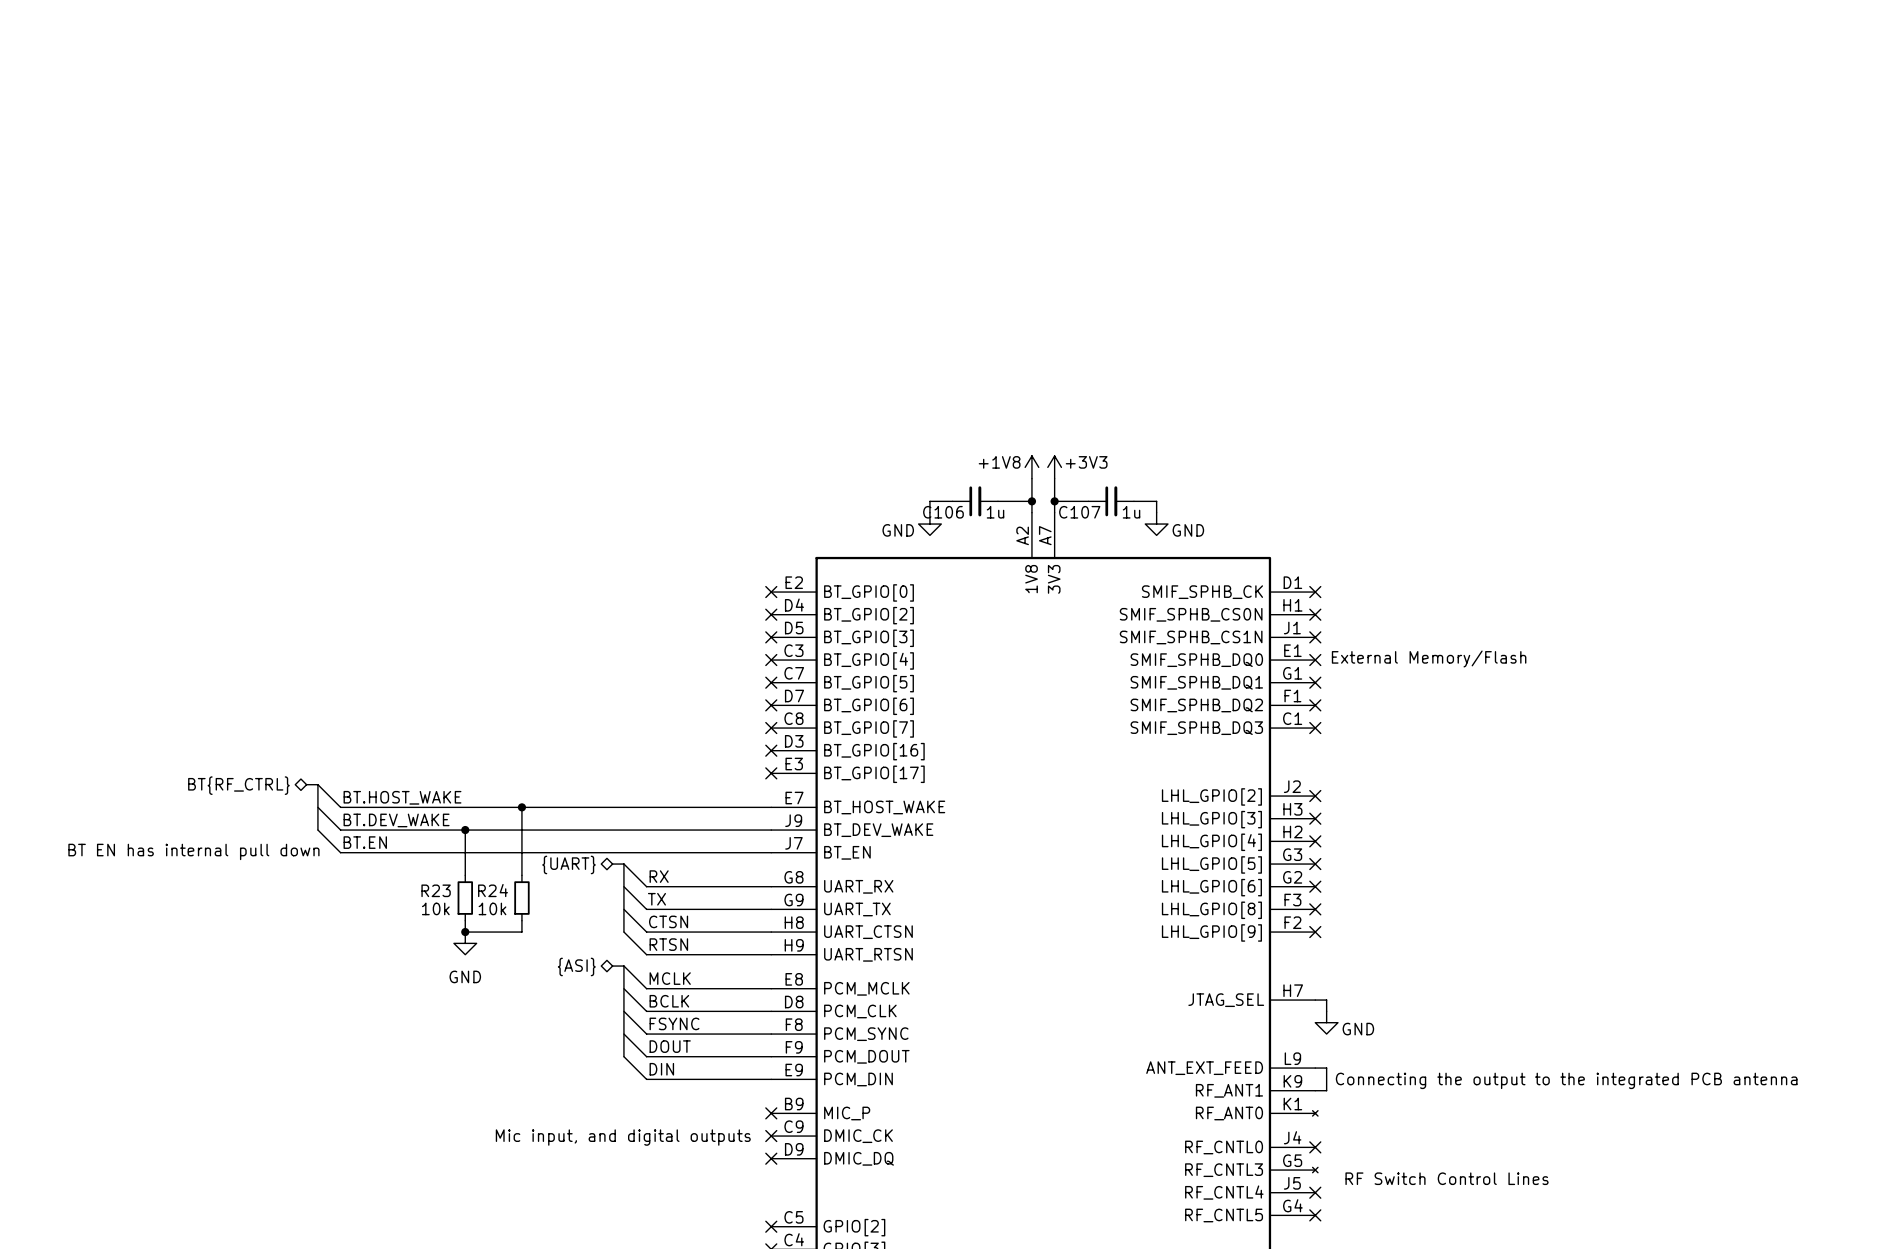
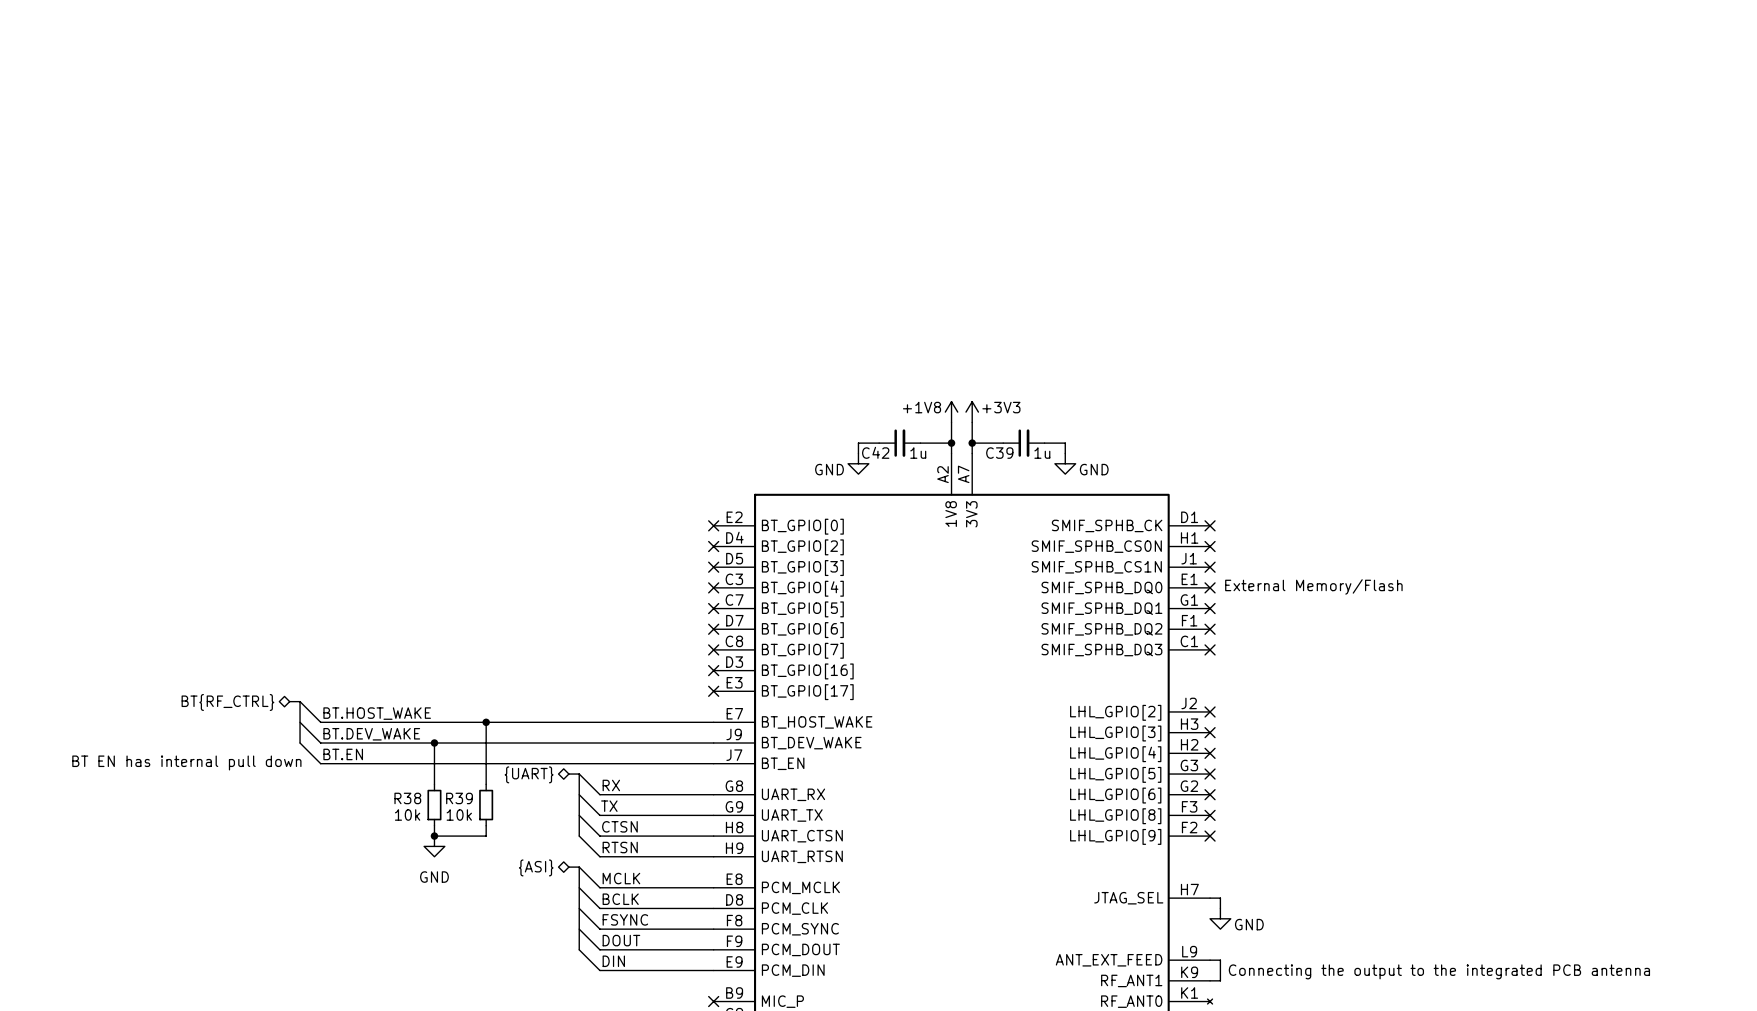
C106 name: C106 (943, 512) -> C42 (875, 452)
C107 name: C107 (1079, 512) -> C39 (999, 453)
R23 name: R23 (436, 890) -> R38 (407, 798)
R24 name: R24 (493, 890) -> R39 (459, 798)

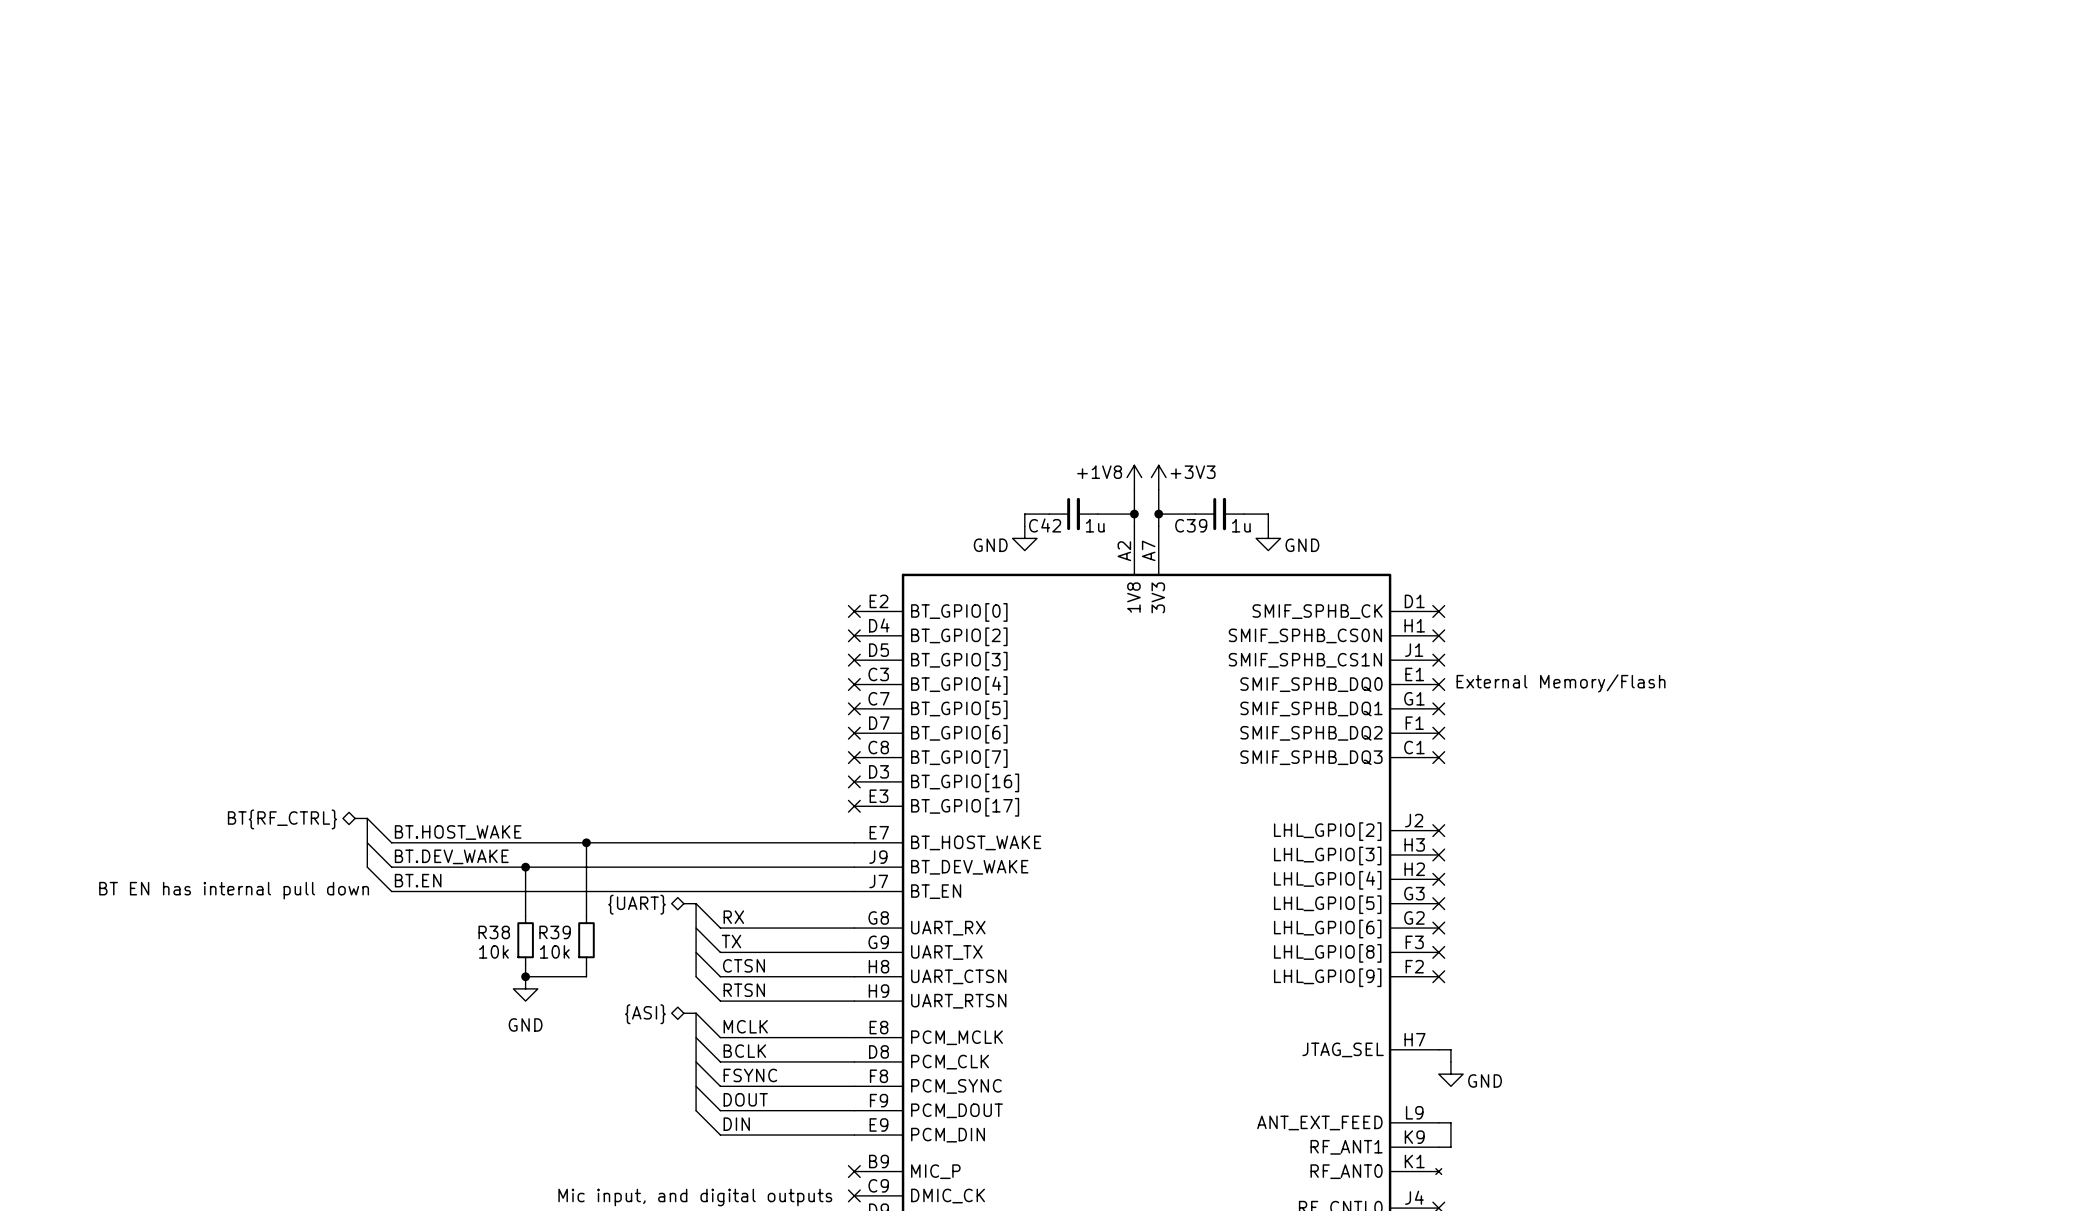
text: Connecting the output to the integrated PCB antenna (1439, 971) -> none

